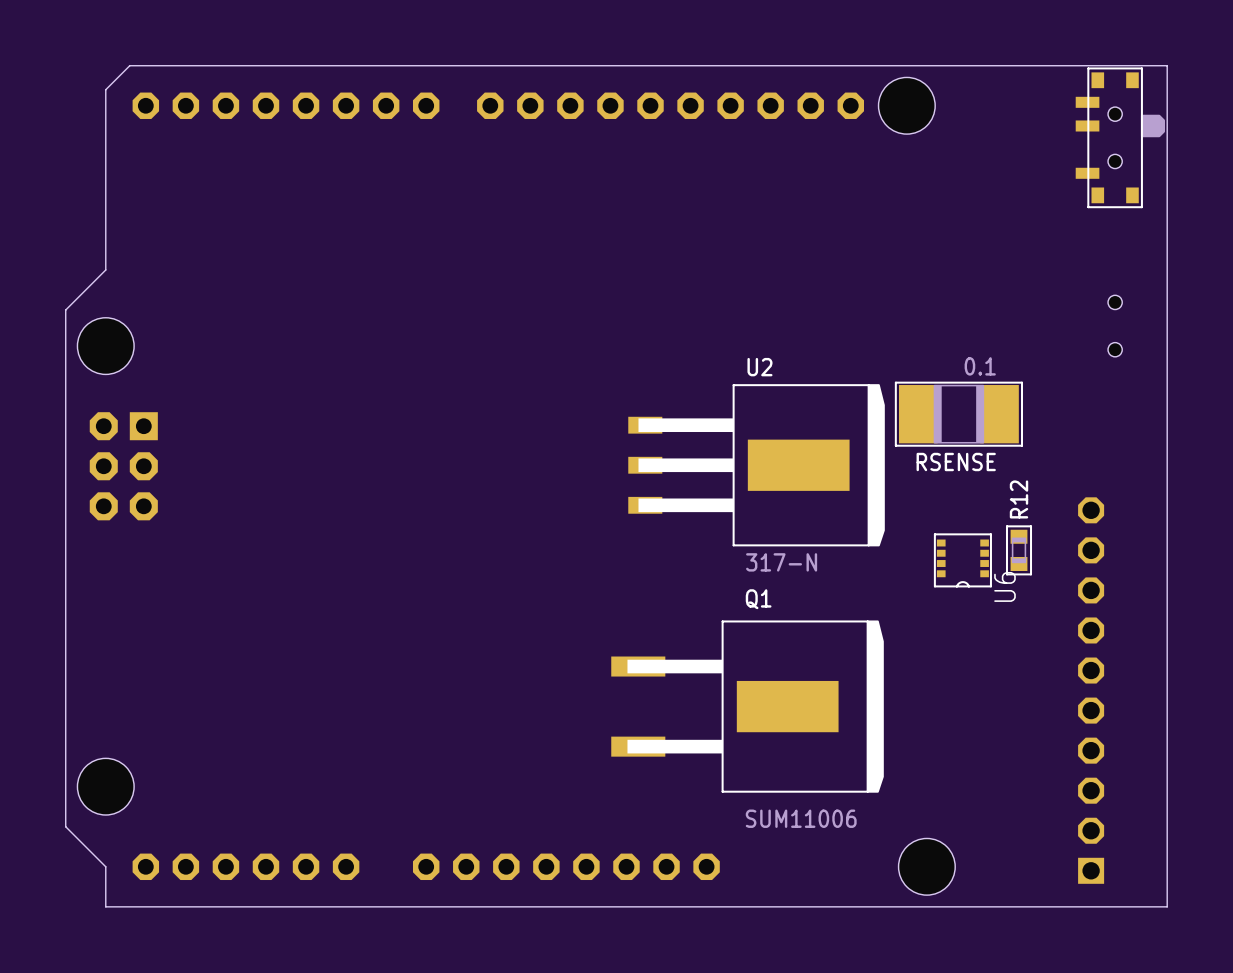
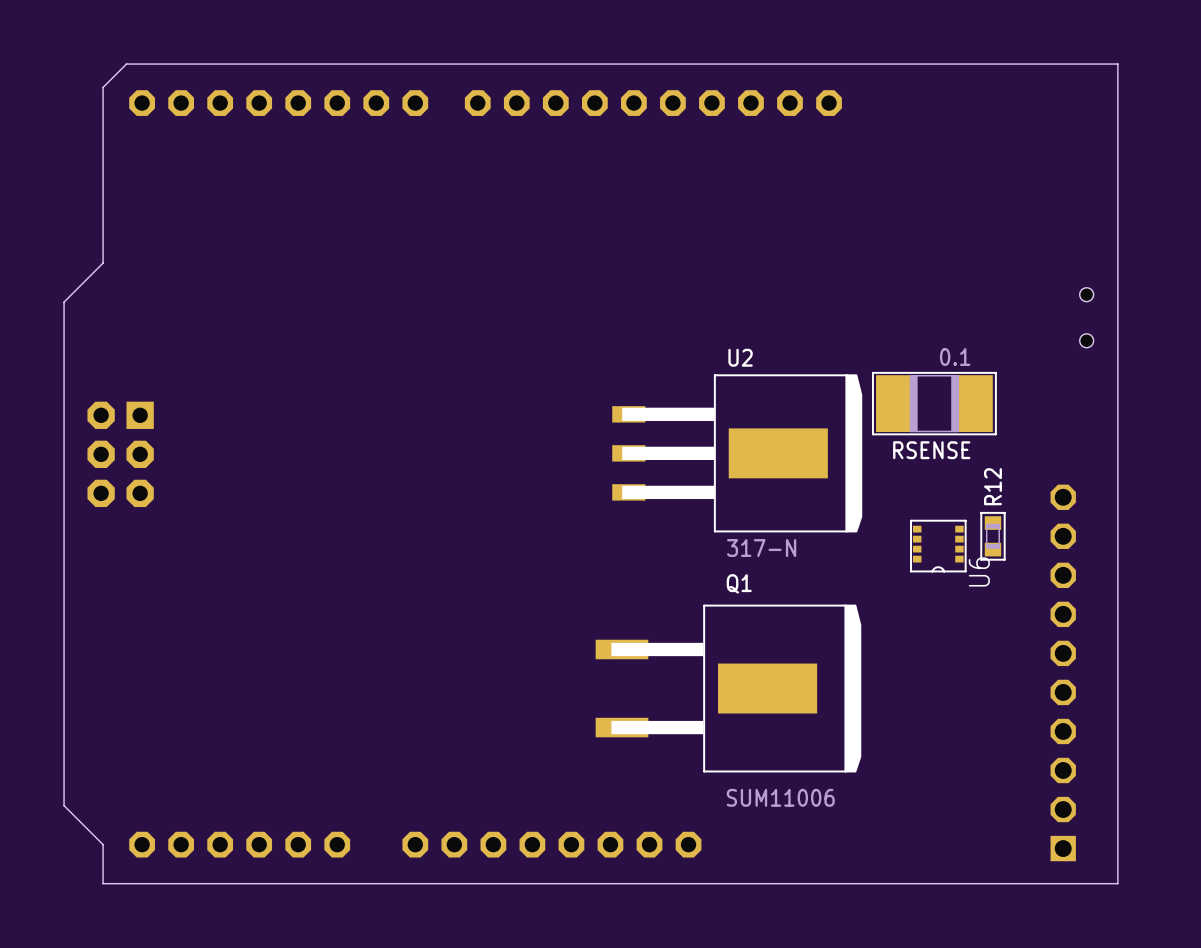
part footprint: [65, 65, 1168, 907] -> [64, 64, 1118, 884]
part: (1120, 137) -> none

